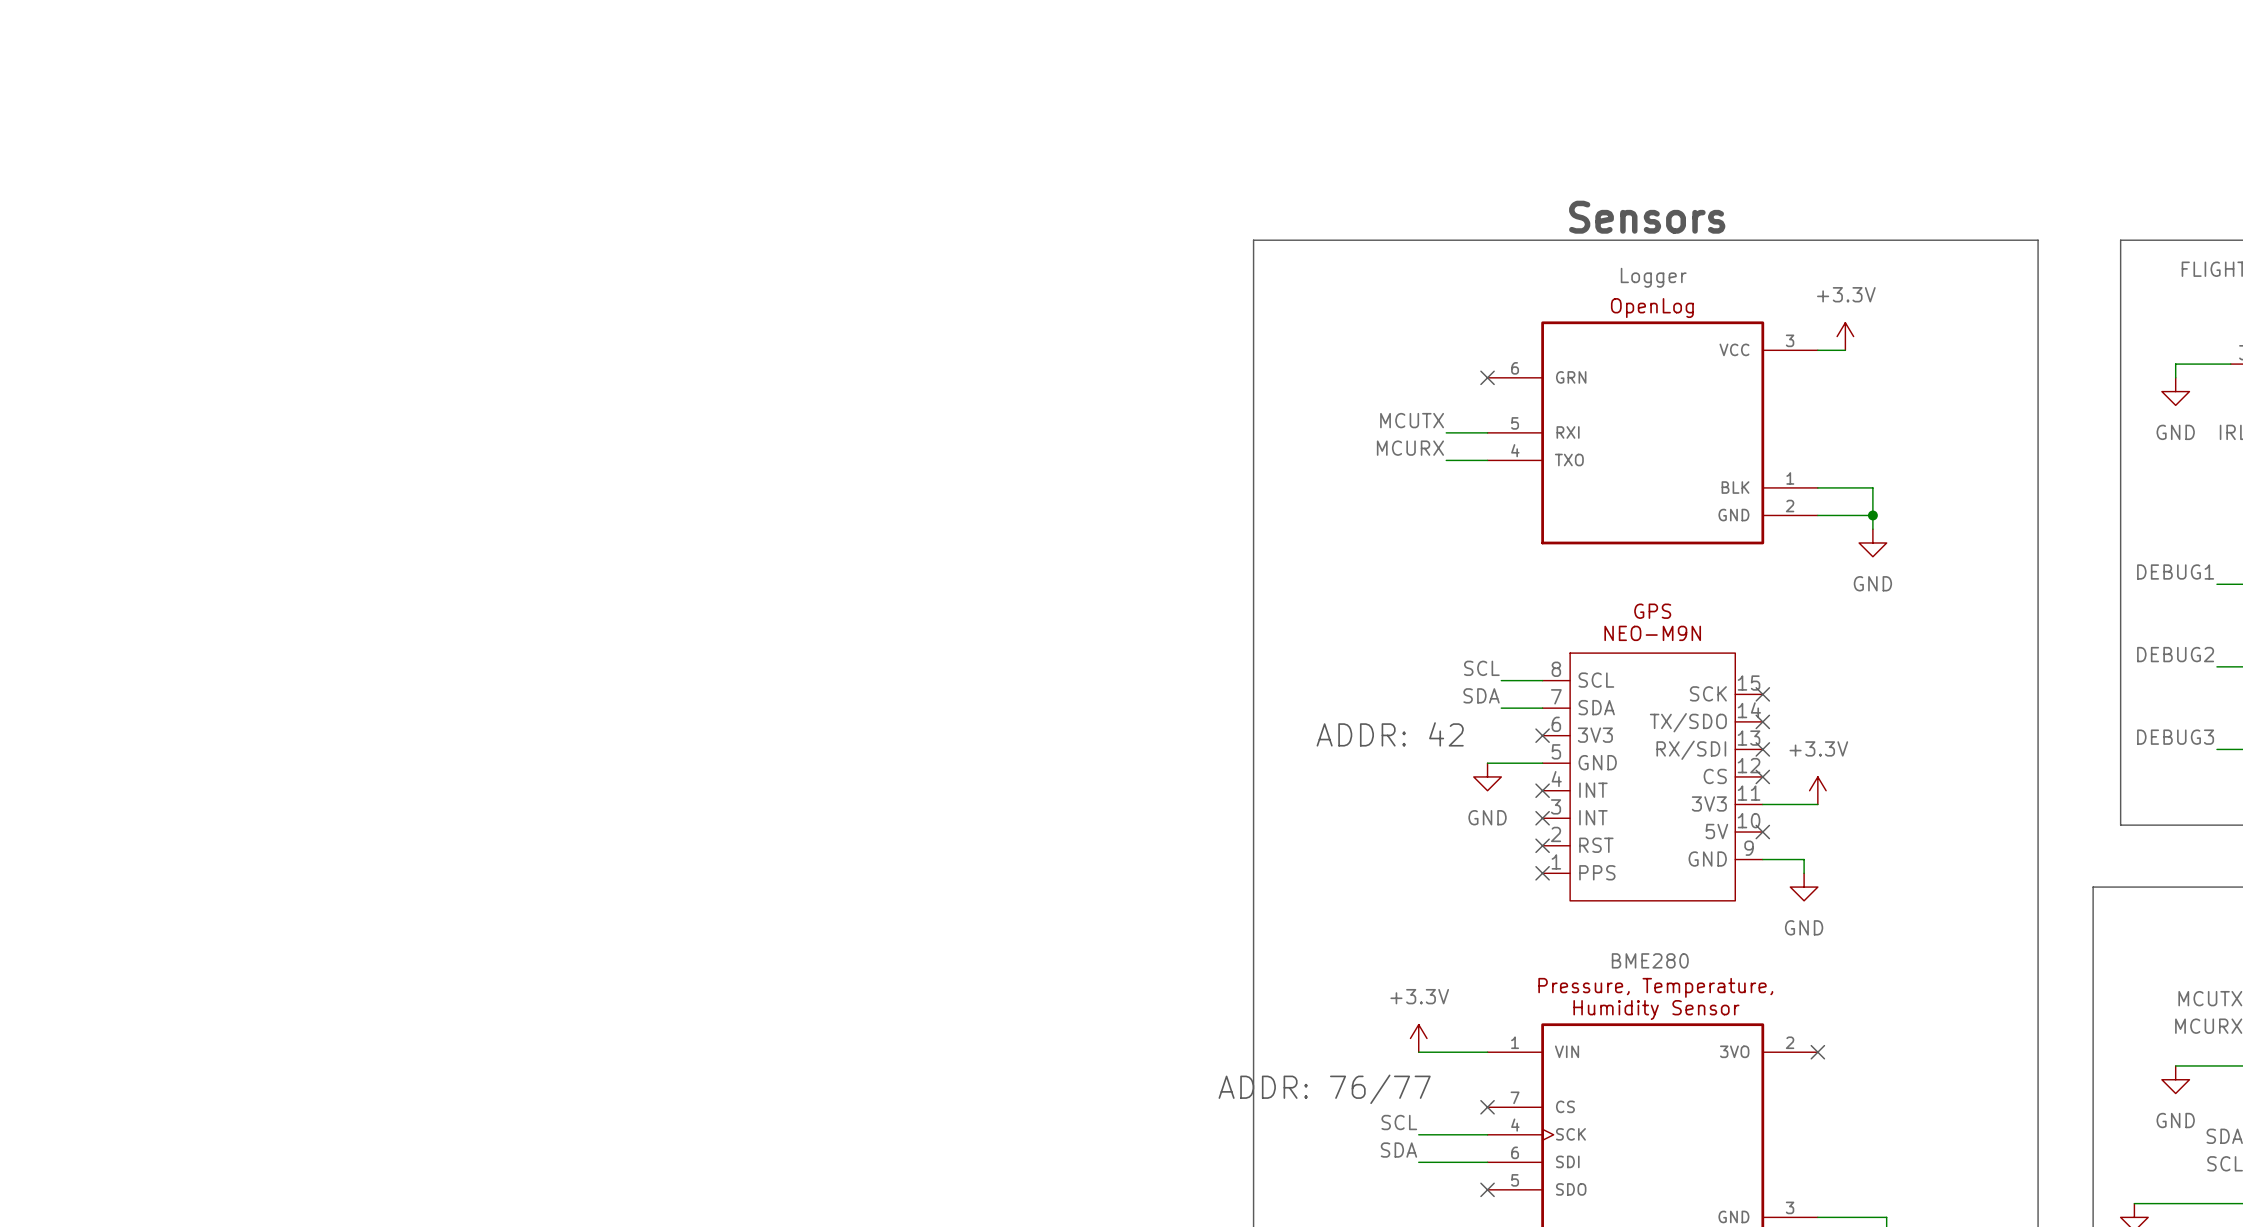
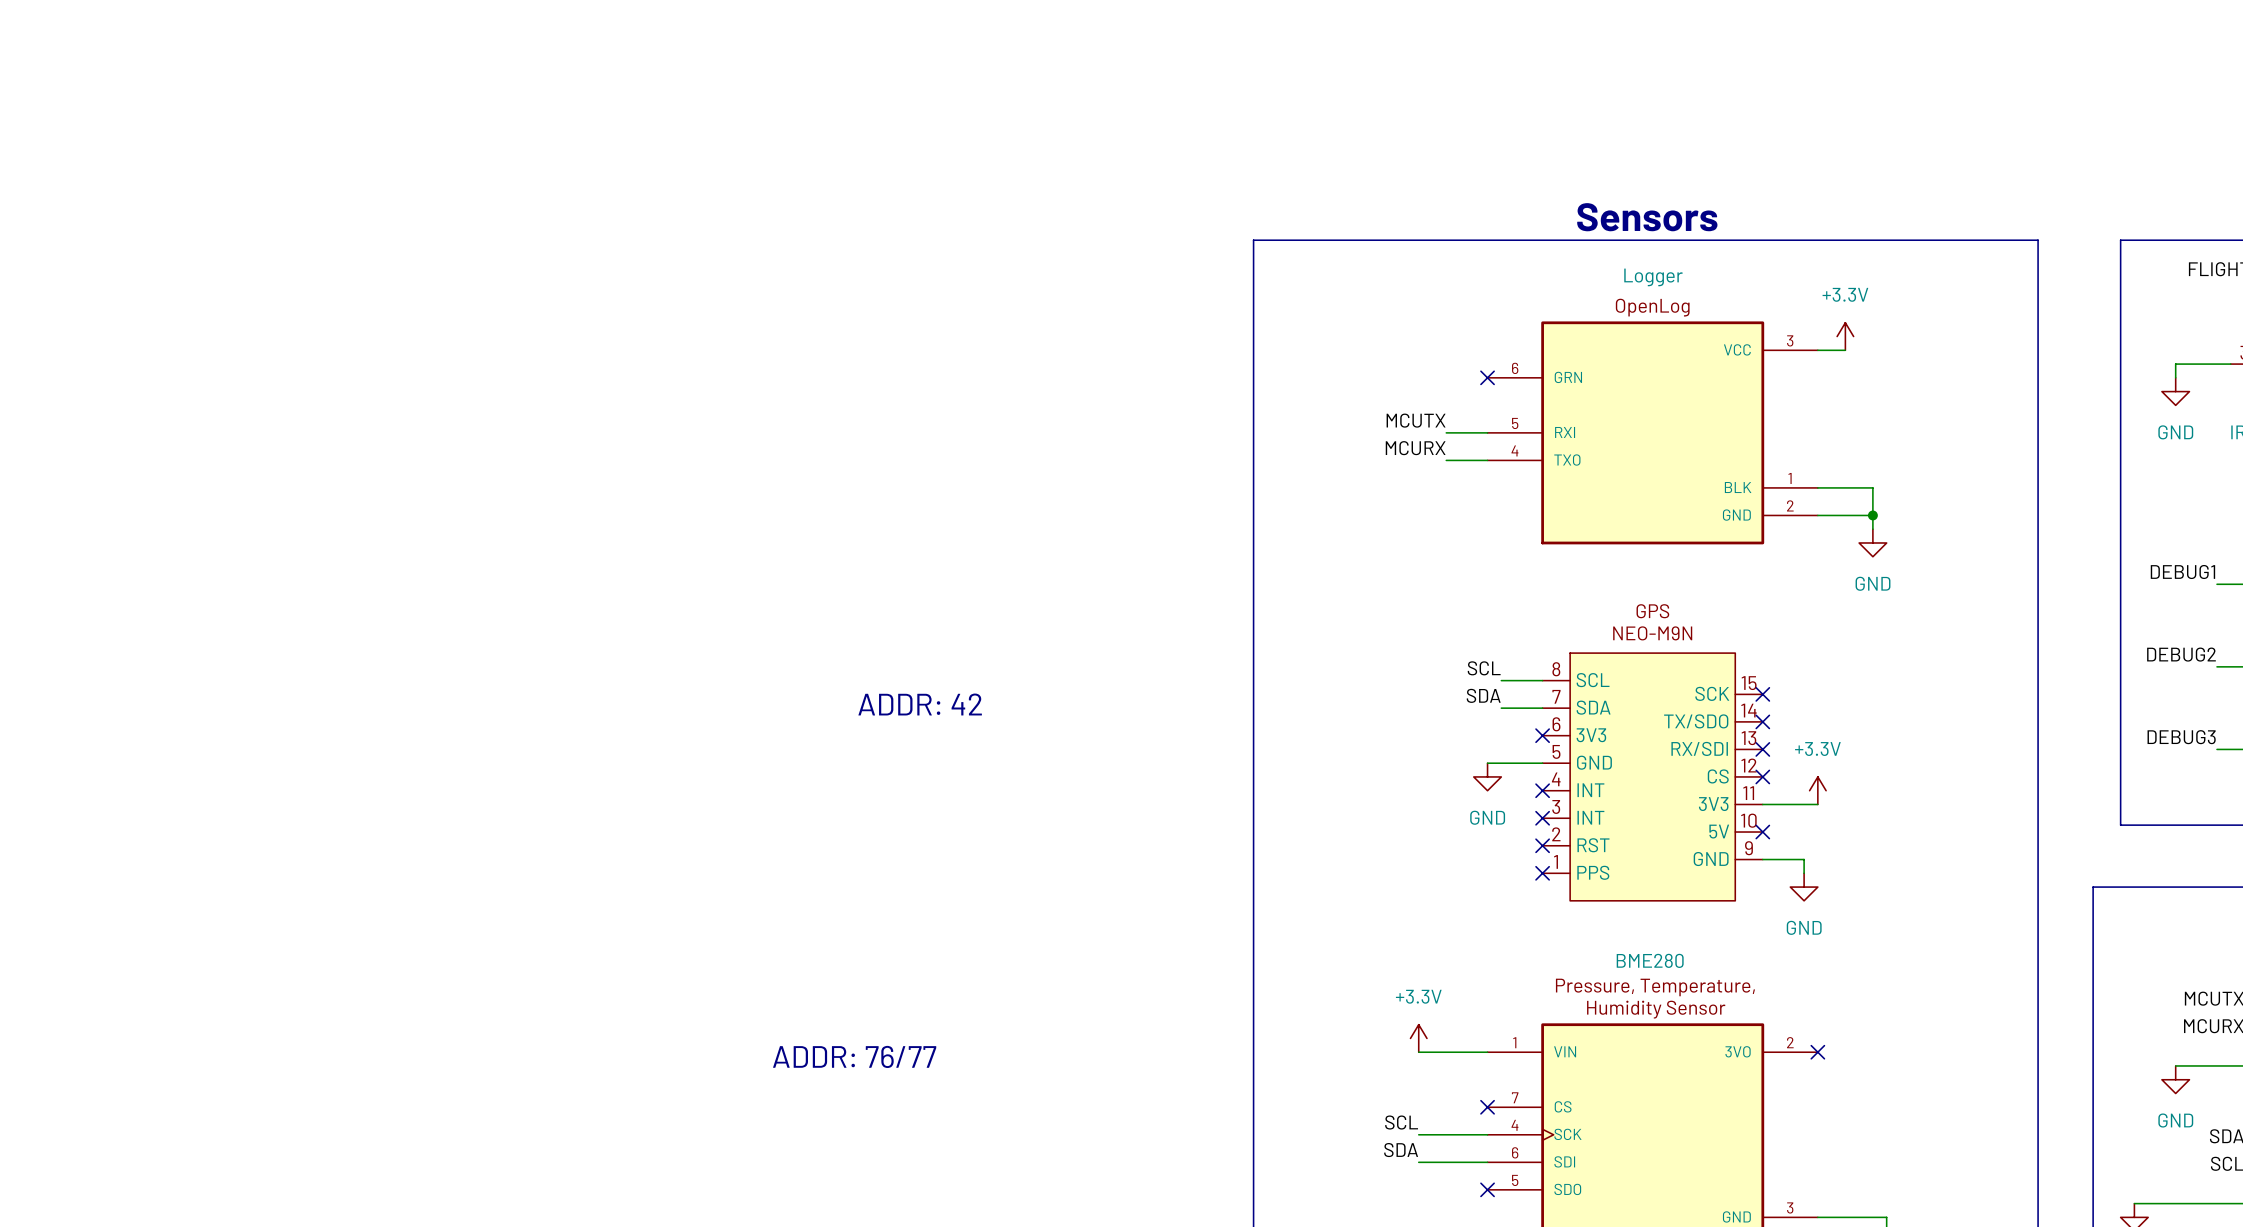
text: none -> ADDR: 42 (920, 704)
text: ADDR: 42 (1390, 734) -> none
text: none -> ADDR: 76/77 (854, 1056)
text: ADDR: 76/77 (1324, 1089) -> none

